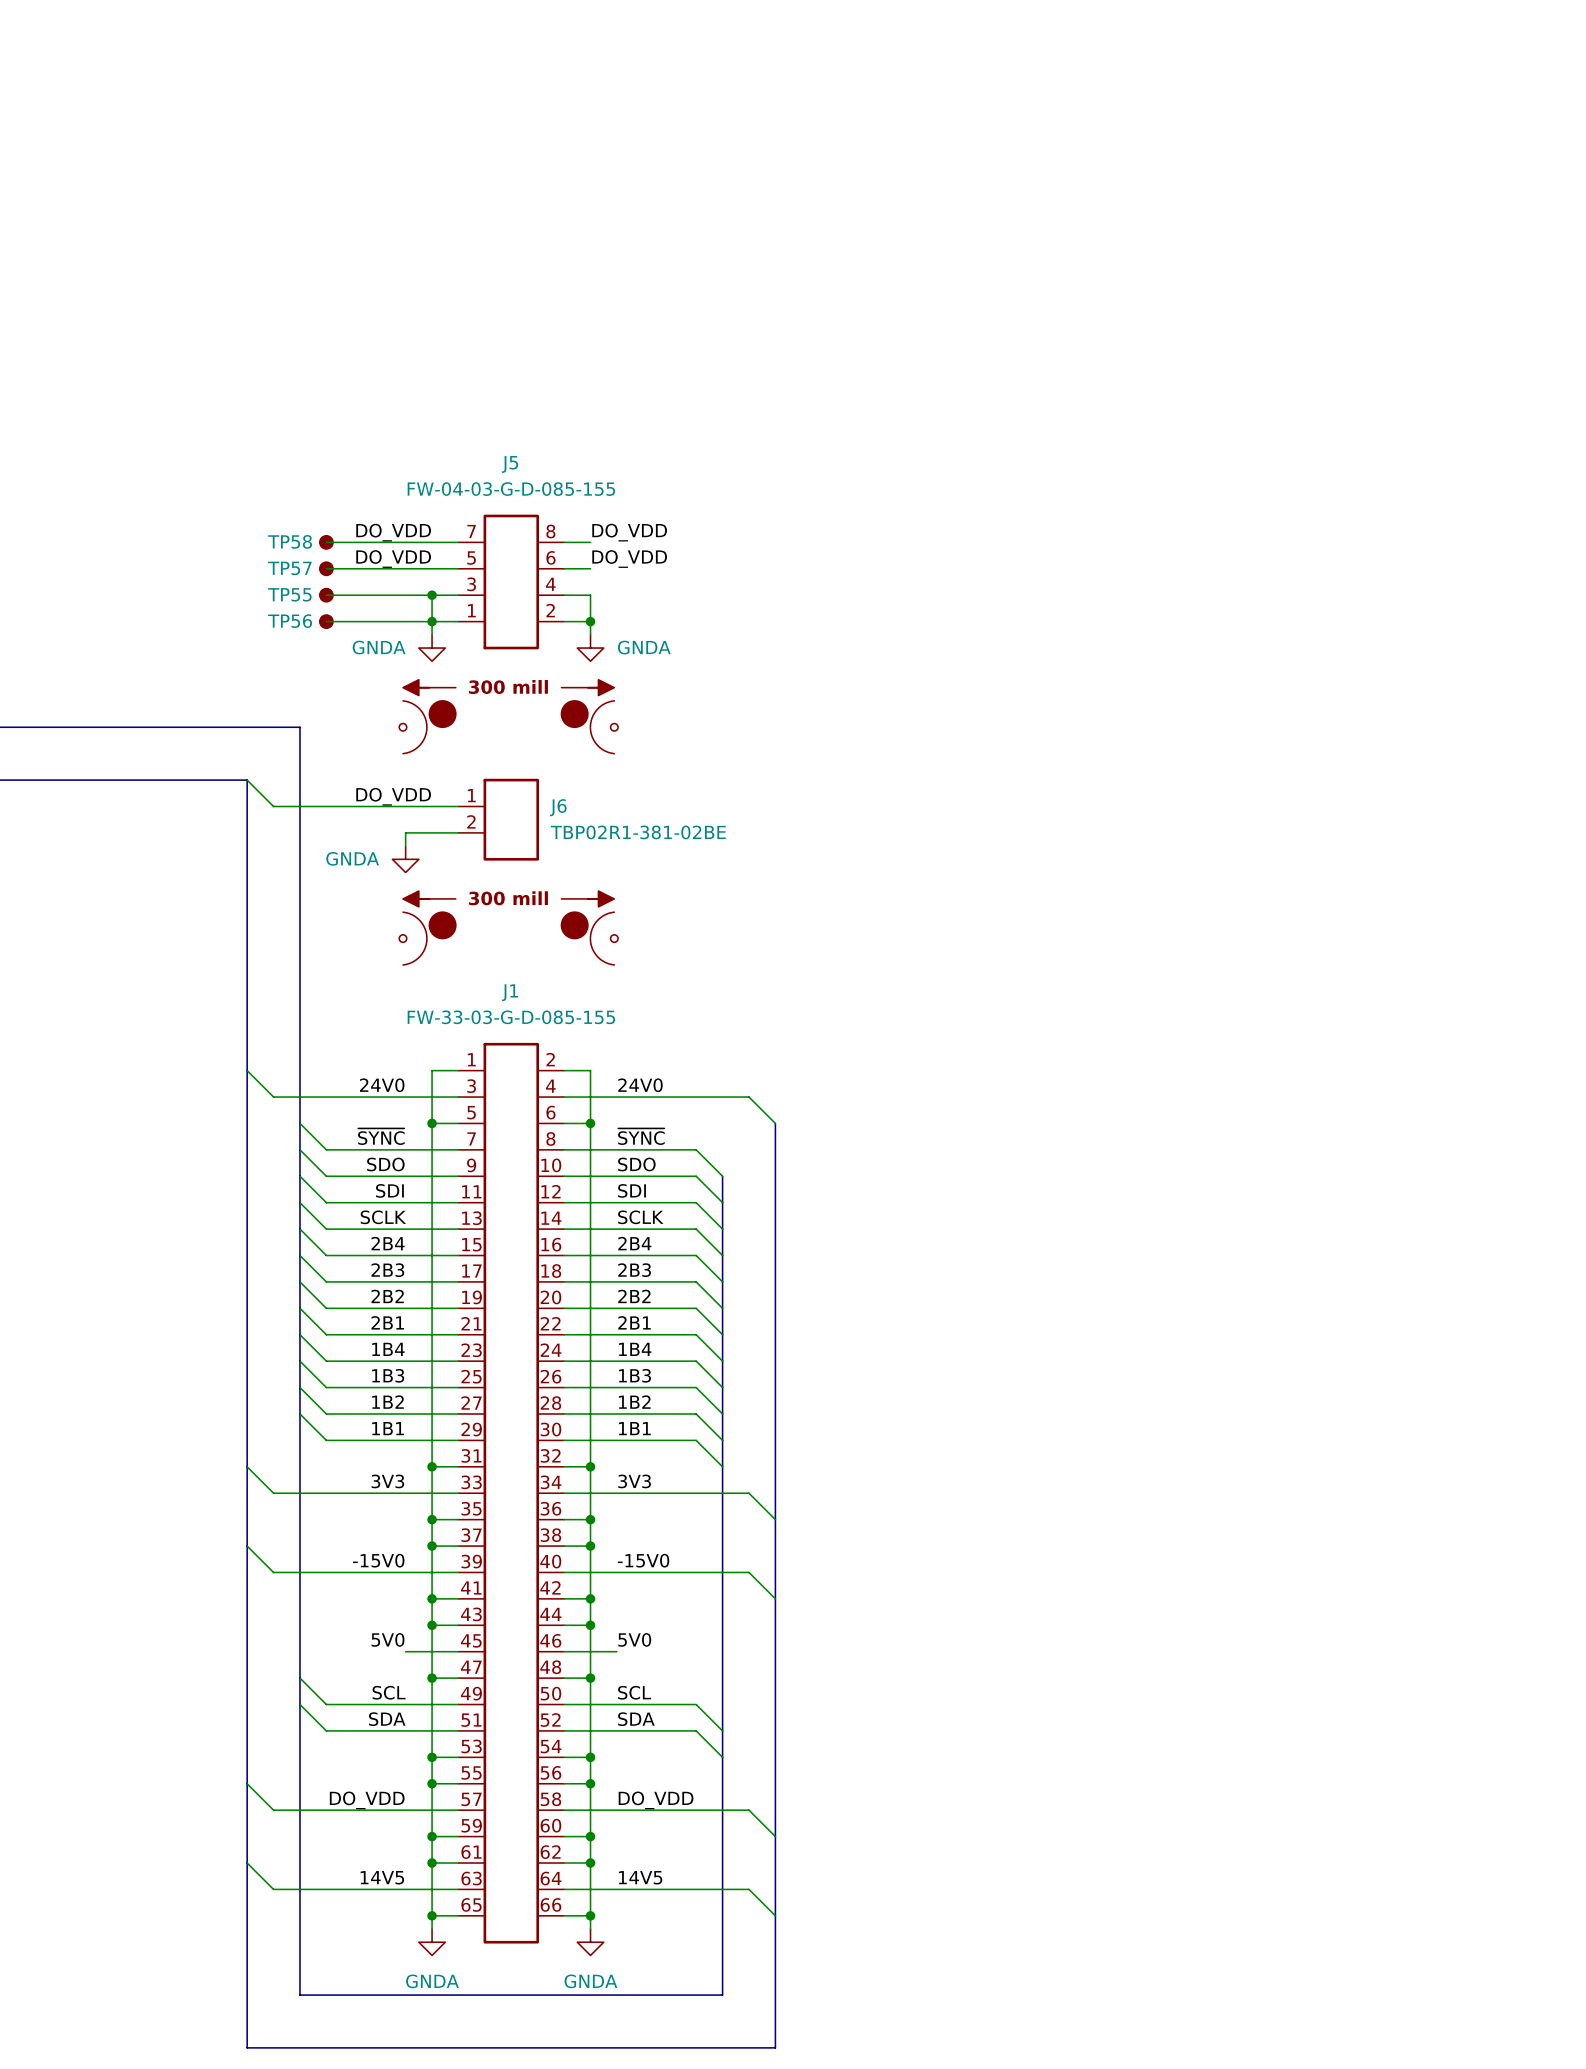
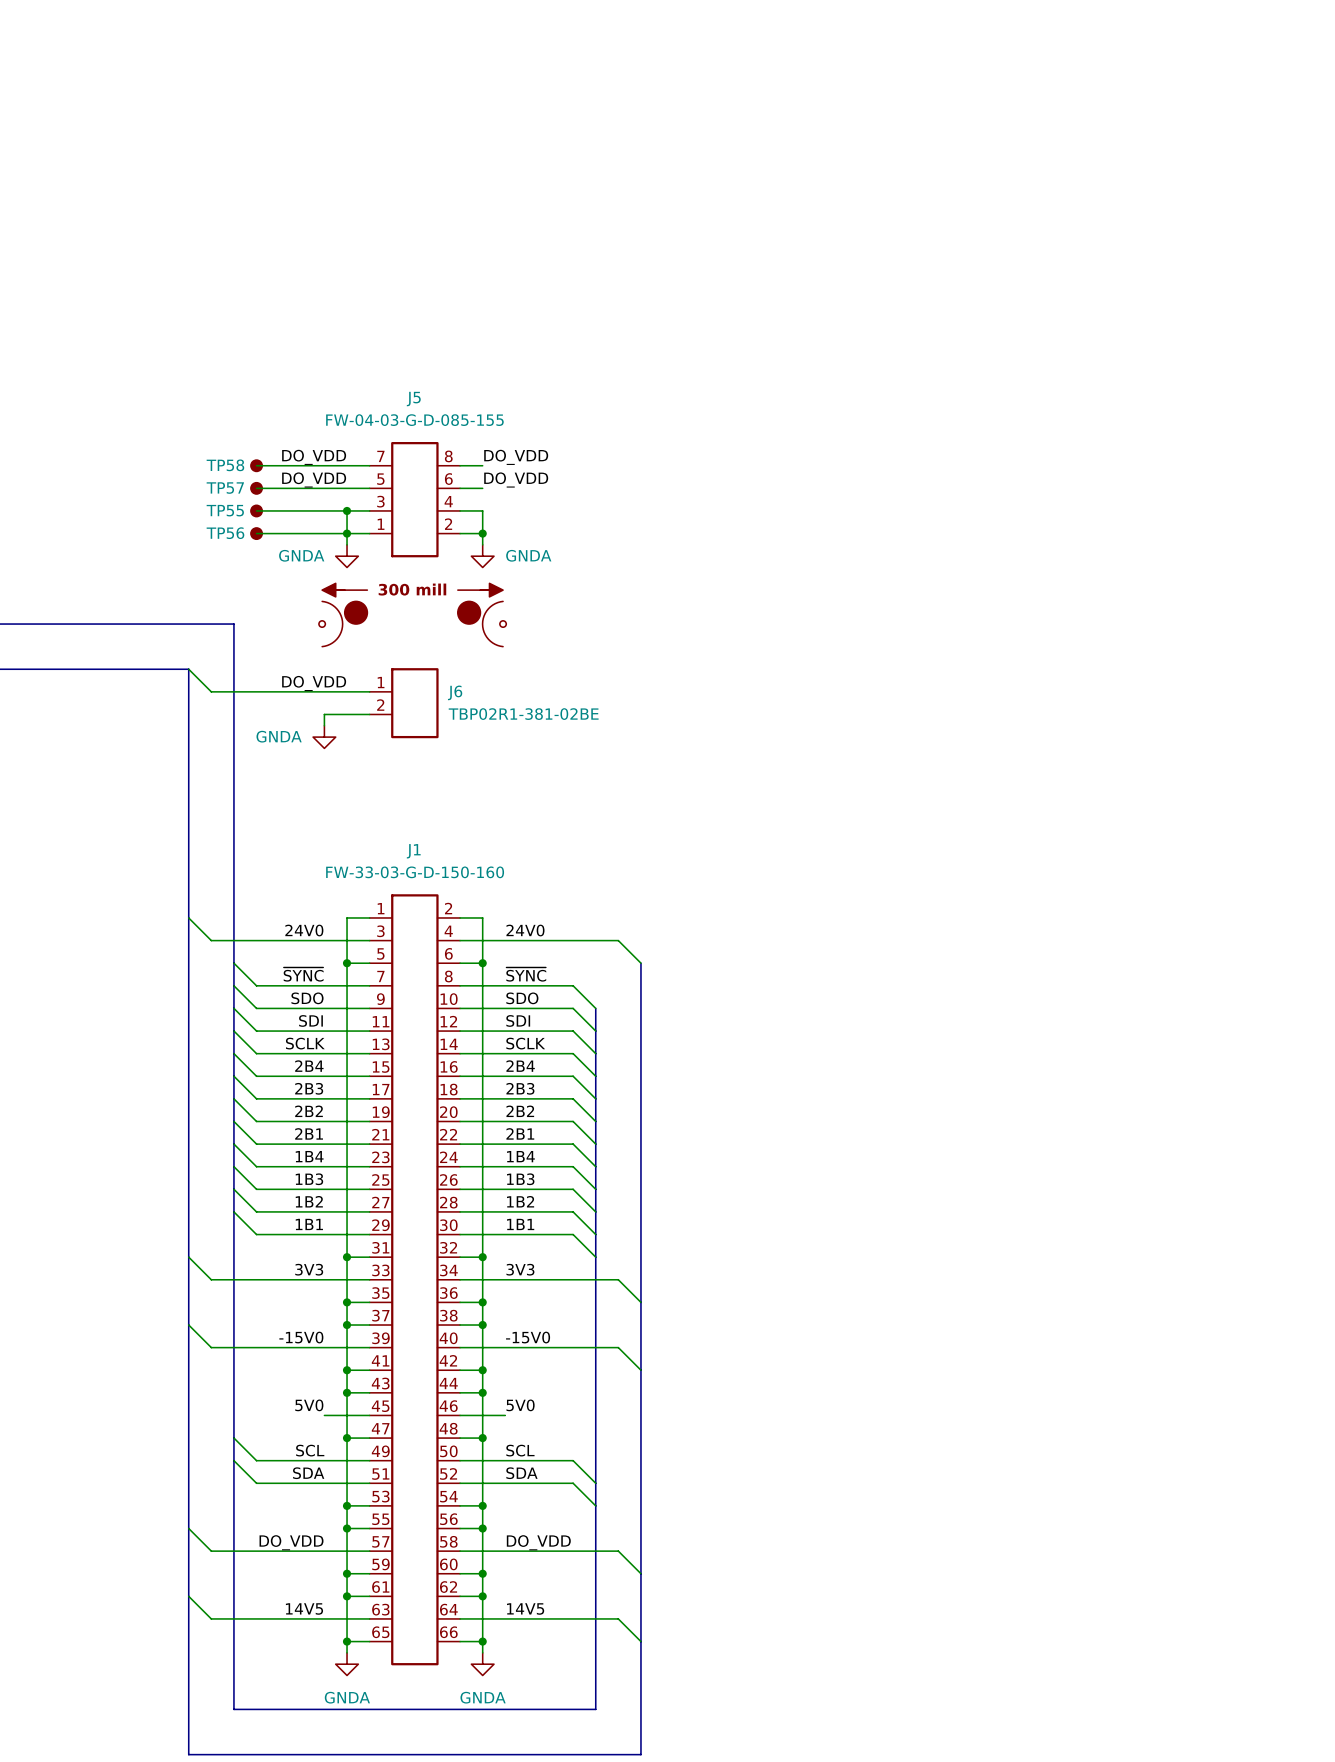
part: (508, 928) -> none
J1 value: FW-33-03-G-D-085-155 (511, 1017) -> FW-33-03-G-D-150-160 (415, 872)

